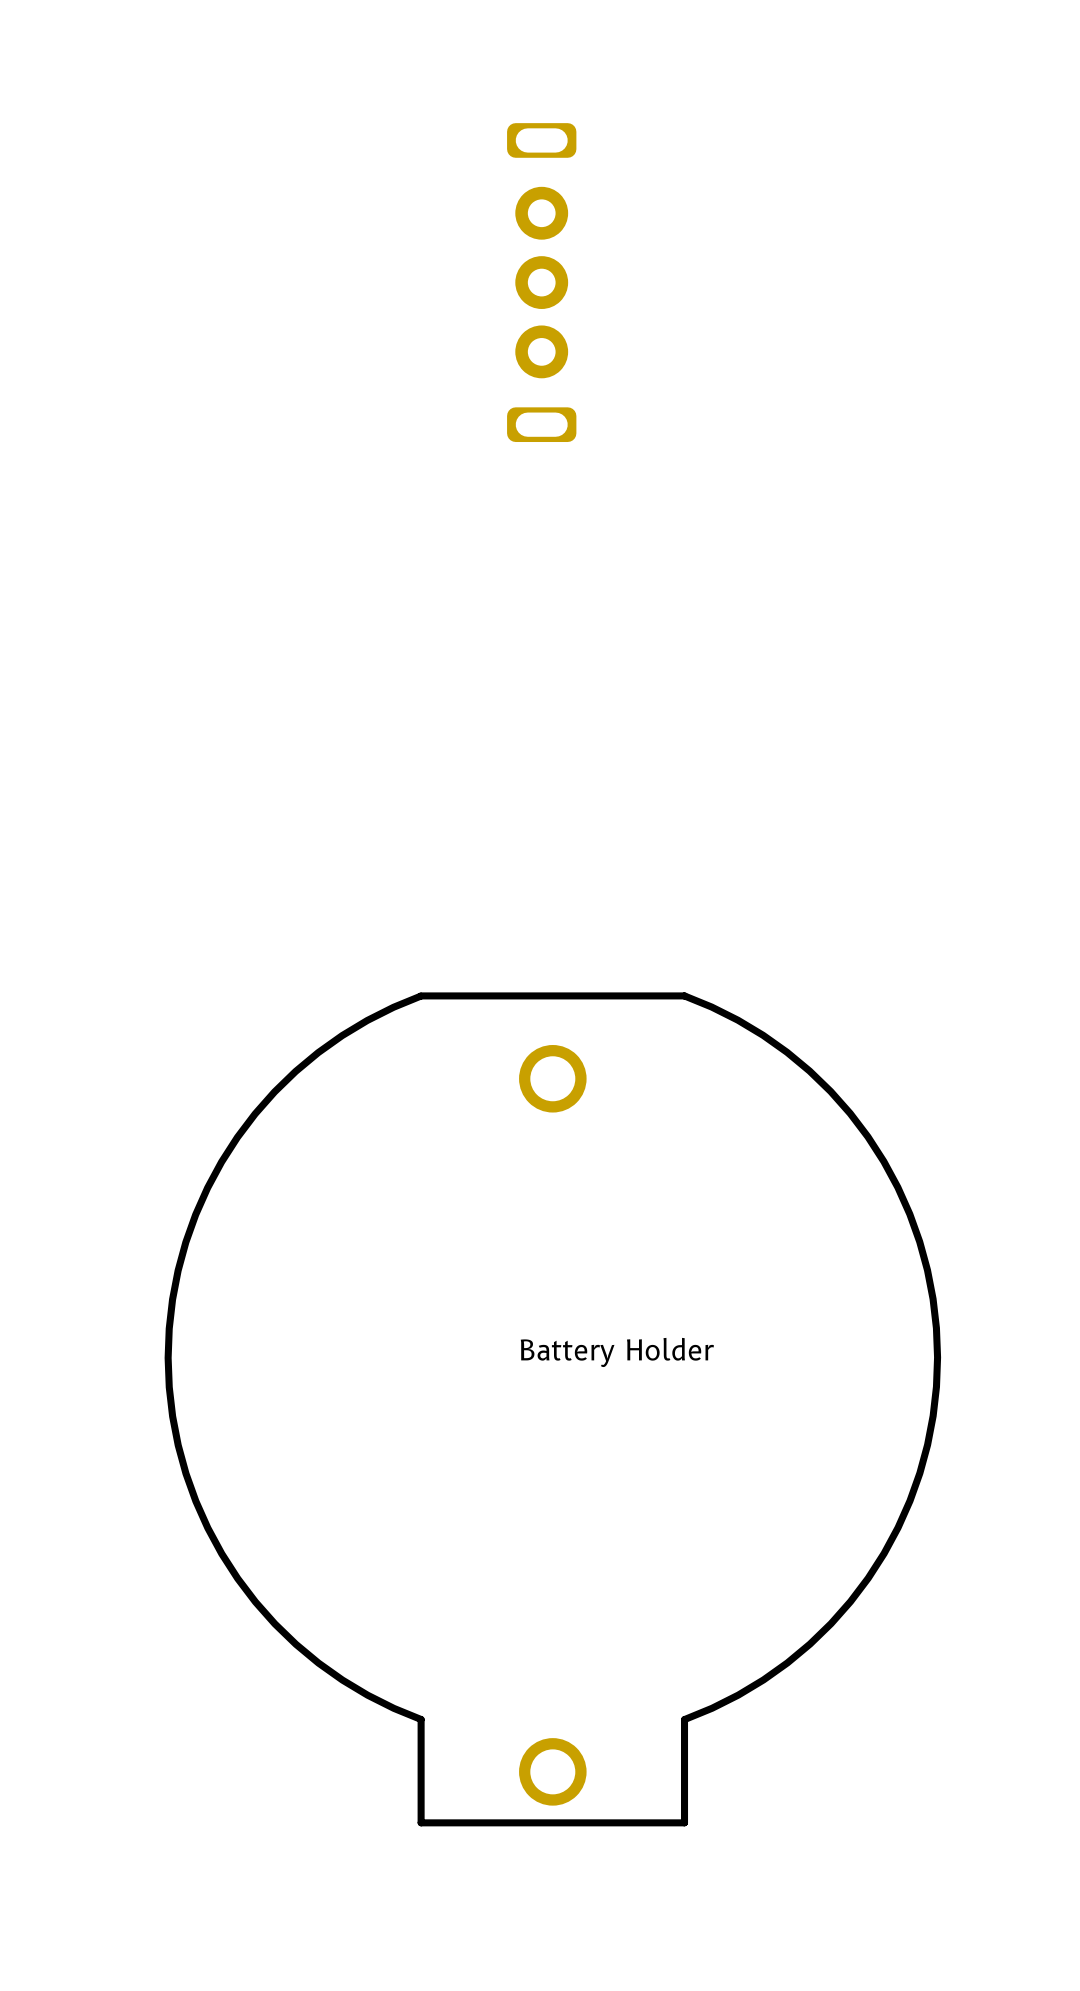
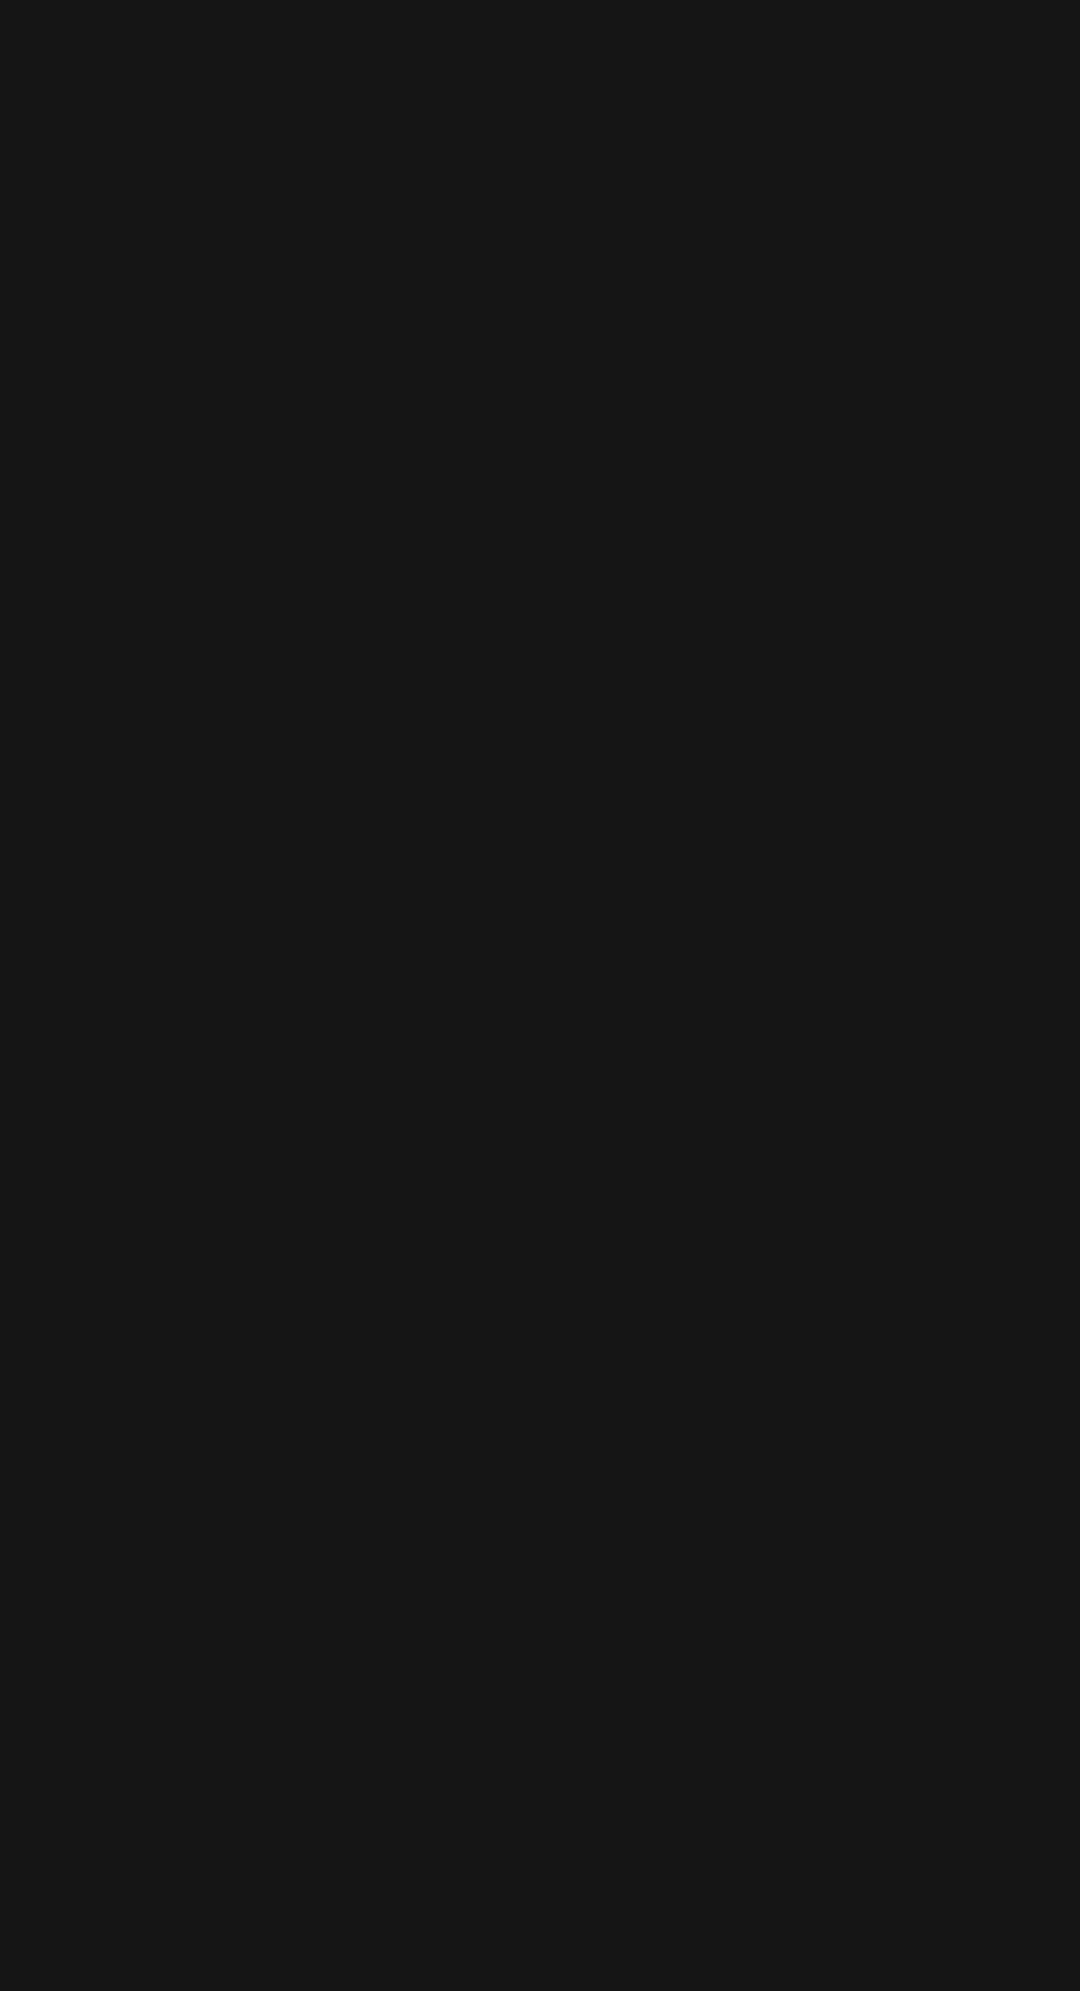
part: (541, 282) -> none
part: Battery Holder (552, 1409) -> none

